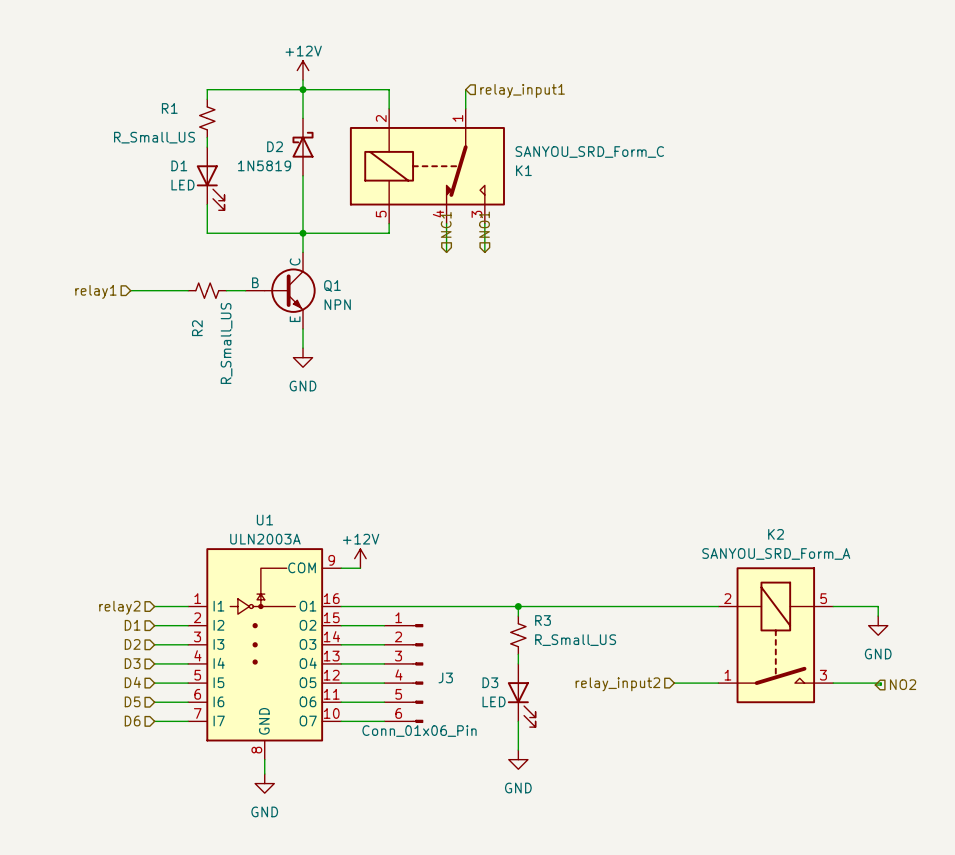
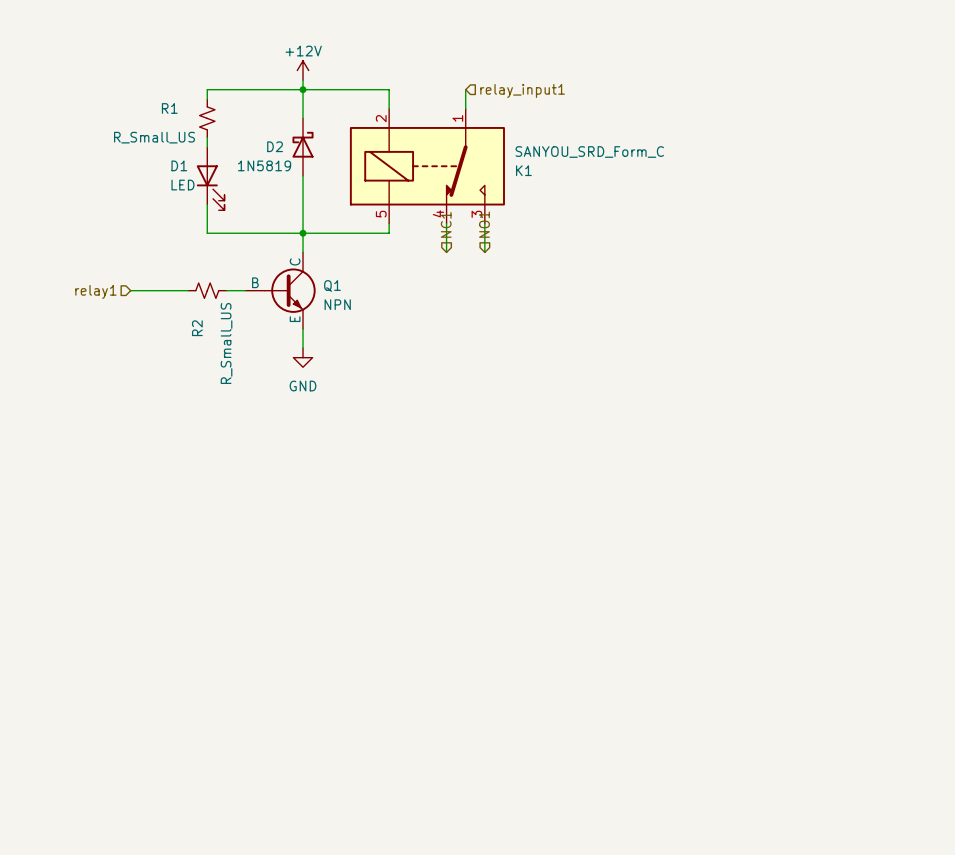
power symbol: +12V (360, 558) -> none
wire: (341, 568) (360, 568) -> none
wire: (154, 606) (188, 606) -> none
wire: (341, 606) (718, 606) -> none
wire: (518, 606) (518, 616) -> none
junction: (518, 606) -> none
wire: (833, 606) (878, 606) (878, 616) -> none
hierarchical label: relay2 (119, 607) -> none
hierarchical label: D1 (132, 625) -> none
wire: (154, 625) (188, 625) -> none
wire: (341, 625) (384, 625) -> none
power symbol: GND (878, 625) -> none
R3: R_Small_US (518, 635) -> none
K2: SANYOU_SRD_Form_A (775, 635) -> none
hierarchical label: D2 (132, 644) -> none
wire: (154, 644) (188, 644) -> none
wire: (341, 644) (384, 644) -> none
U1: ULN2003A (264, 653) -> none
wire: (518, 654) (518, 663) -> none
hierarchical label: D3 (132, 663) -> none
wire: (154, 663) (188, 663) -> none
wire: (341, 663) (384, 663) -> none
J3: Conn_01x06_Pin (403, 673) -> none
hierarchical label: D4 (132, 682) -> none
wire: (154, 683) (188, 683) -> none
wire: (341, 683) (384, 683) -> none
wire: (674, 683) (718, 683) -> none
wire: (833, 683) (881, 683) (881, 685) (875, 685) -> none
hierarchical label: relay_input2 (617, 684) -> none
hierarchical label: NO2 (903, 684) -> none
D3: LED (521, 695) -> none
hierarchical label: D5 (132, 701) -> none
wire: (154, 702) (188, 702) -> none
wire: (341, 702) (384, 702) -> none
hierarchical label: D6 (132, 721) -> none
wire: (154, 721) (188, 721) -> none
wire: (341, 721) (384, 721) -> none
wire: (518, 721) (518, 750) -> none
wire: (264, 759) (264, 774) -> none
power symbol: GND (518, 759) -> none
power symbol: GND (264, 783) -> none

